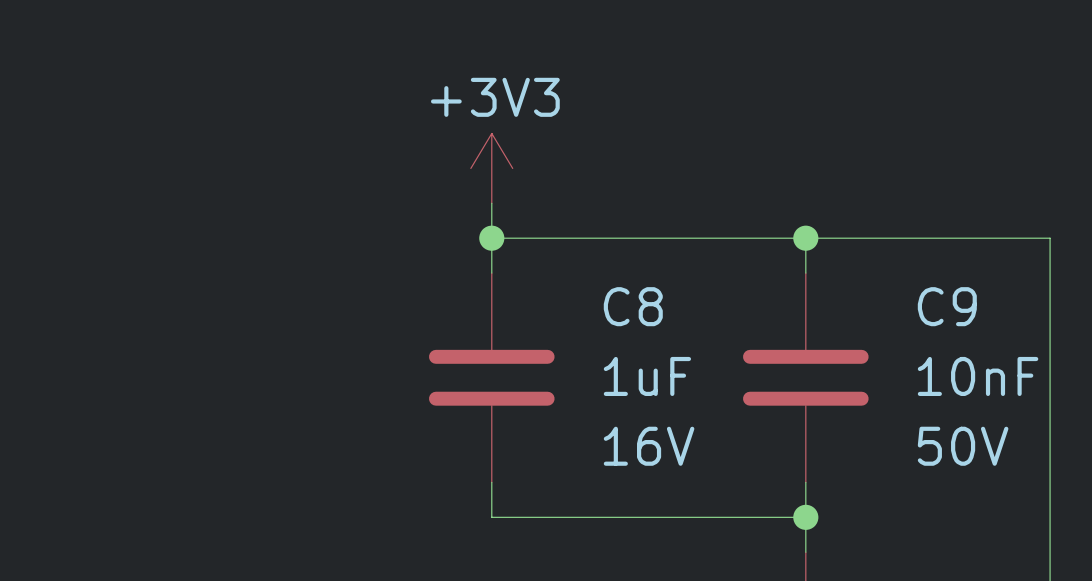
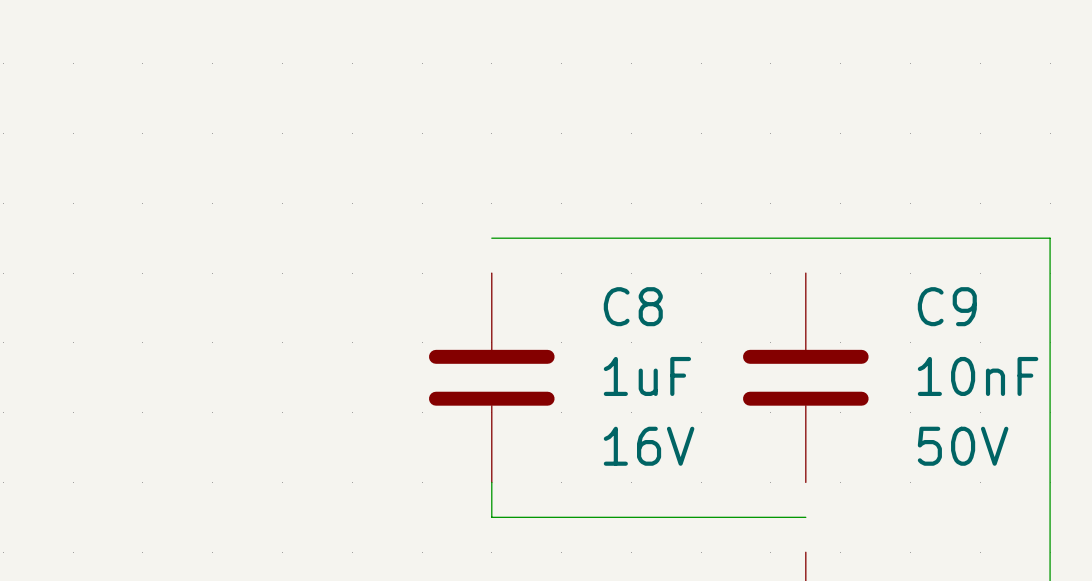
power symbol: +3V3 (491, 168) -> none
wire: (491, 203) (491, 273) -> none
junction: (491, 238) -> none
wire: (805, 238) (805, 273) -> none
junction: (805, 238) -> none
wire: (805, 482) (805, 552) -> none
junction: (805, 517) -> none

